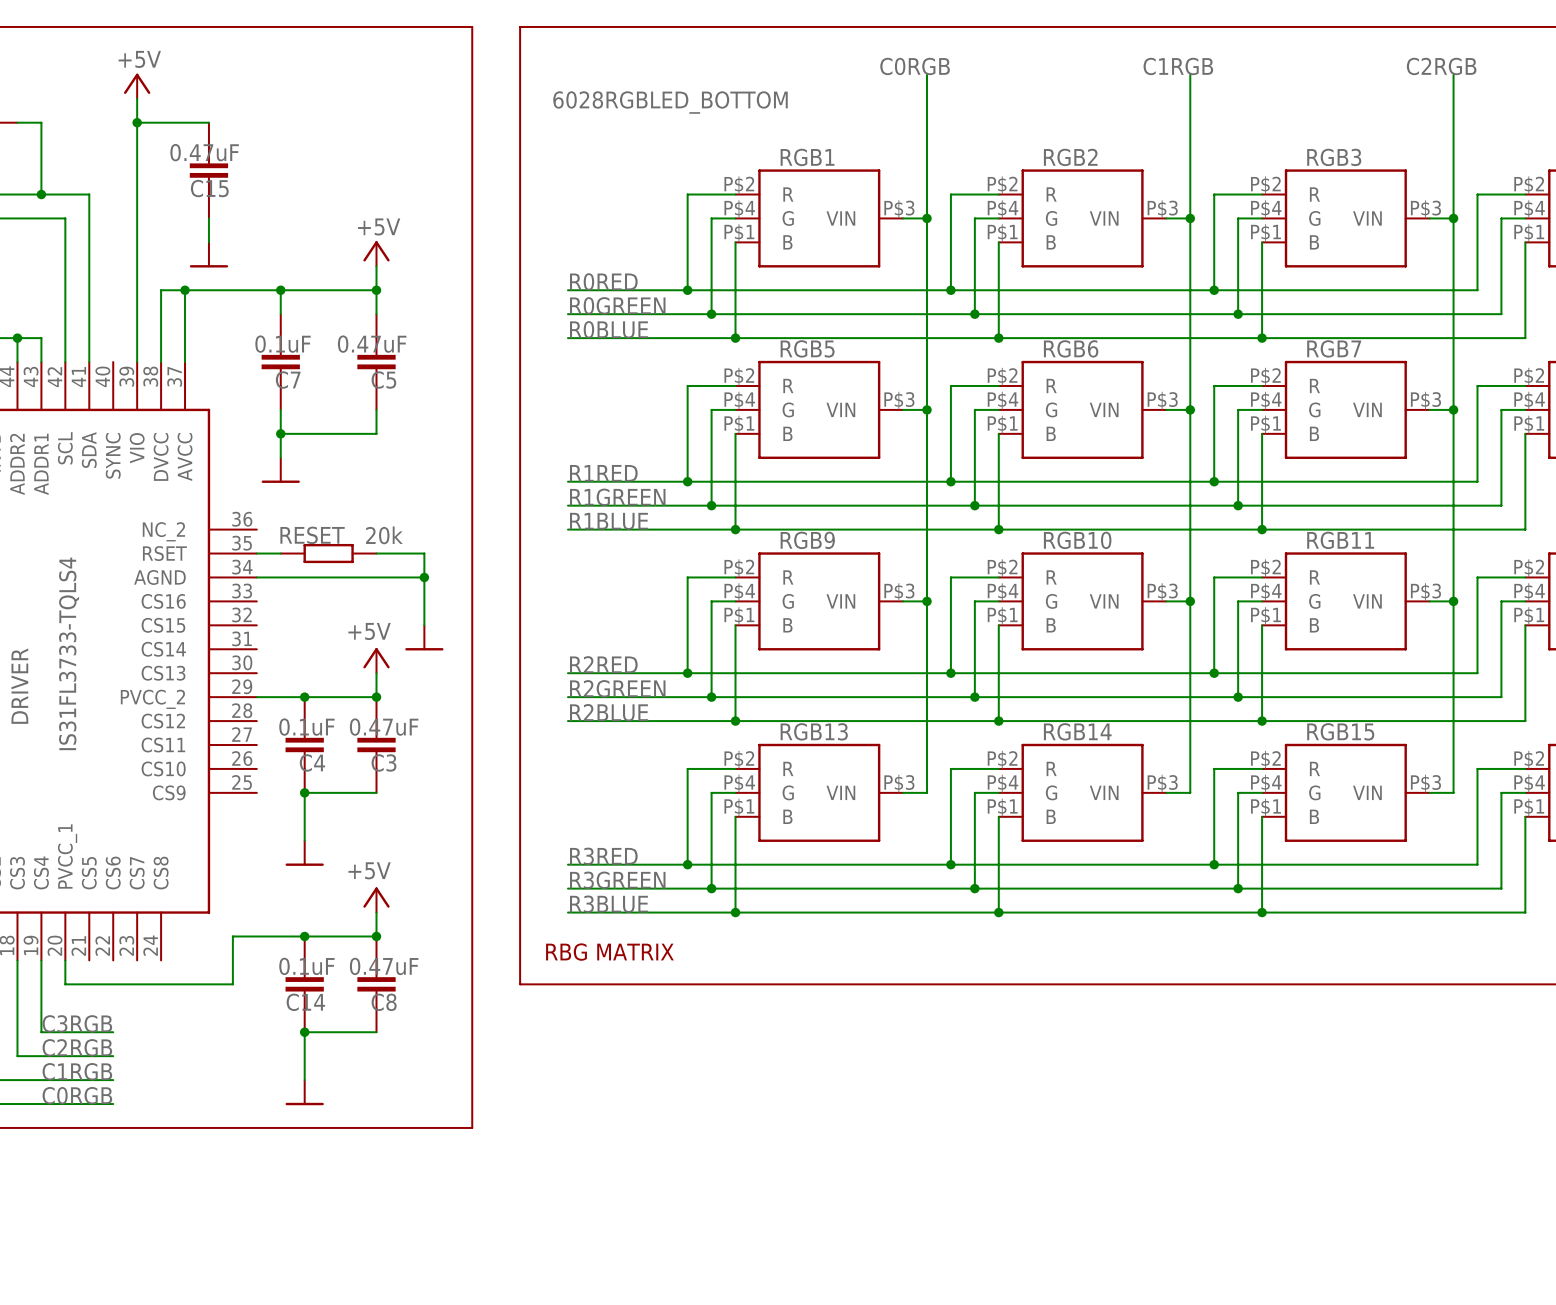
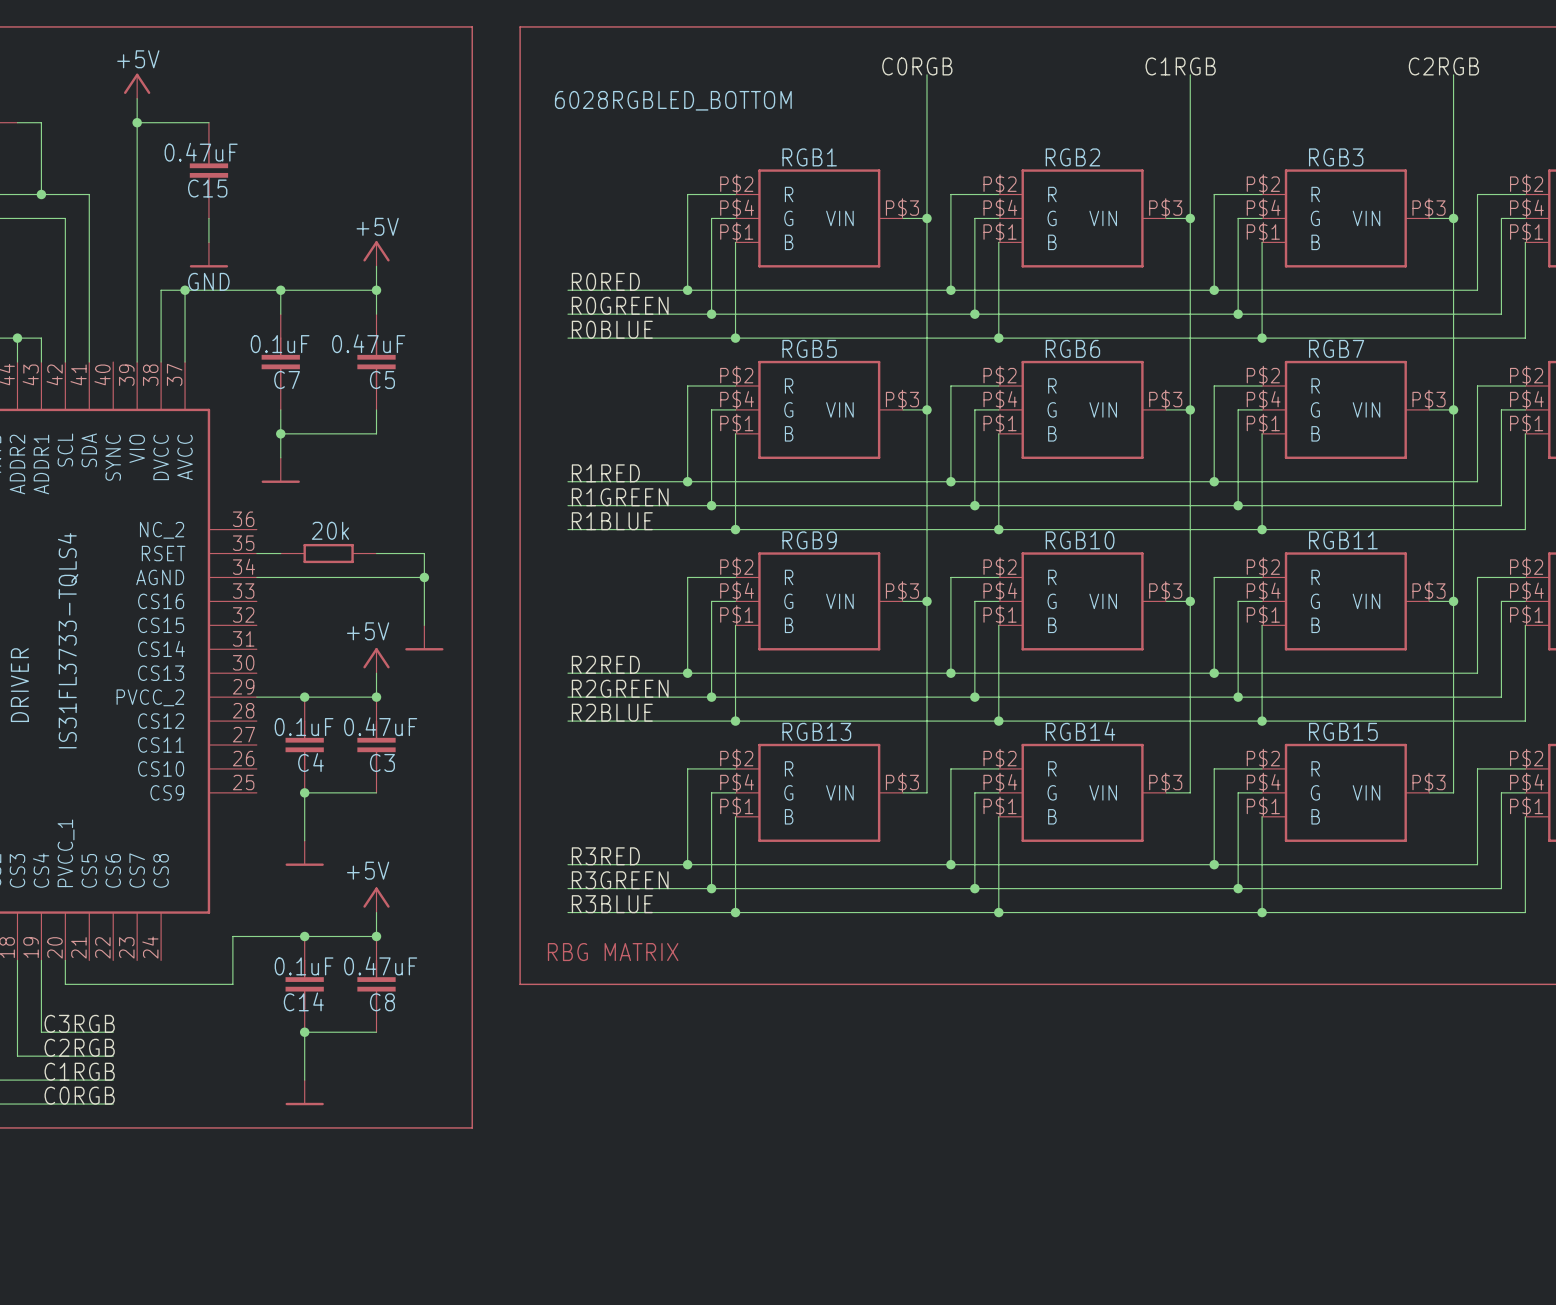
power symbol text: none -> GND (208, 281)
RESET name: RESET (312, 535) -> none
RESET value position: 20k (384, 535) -> 20k (330, 530)

